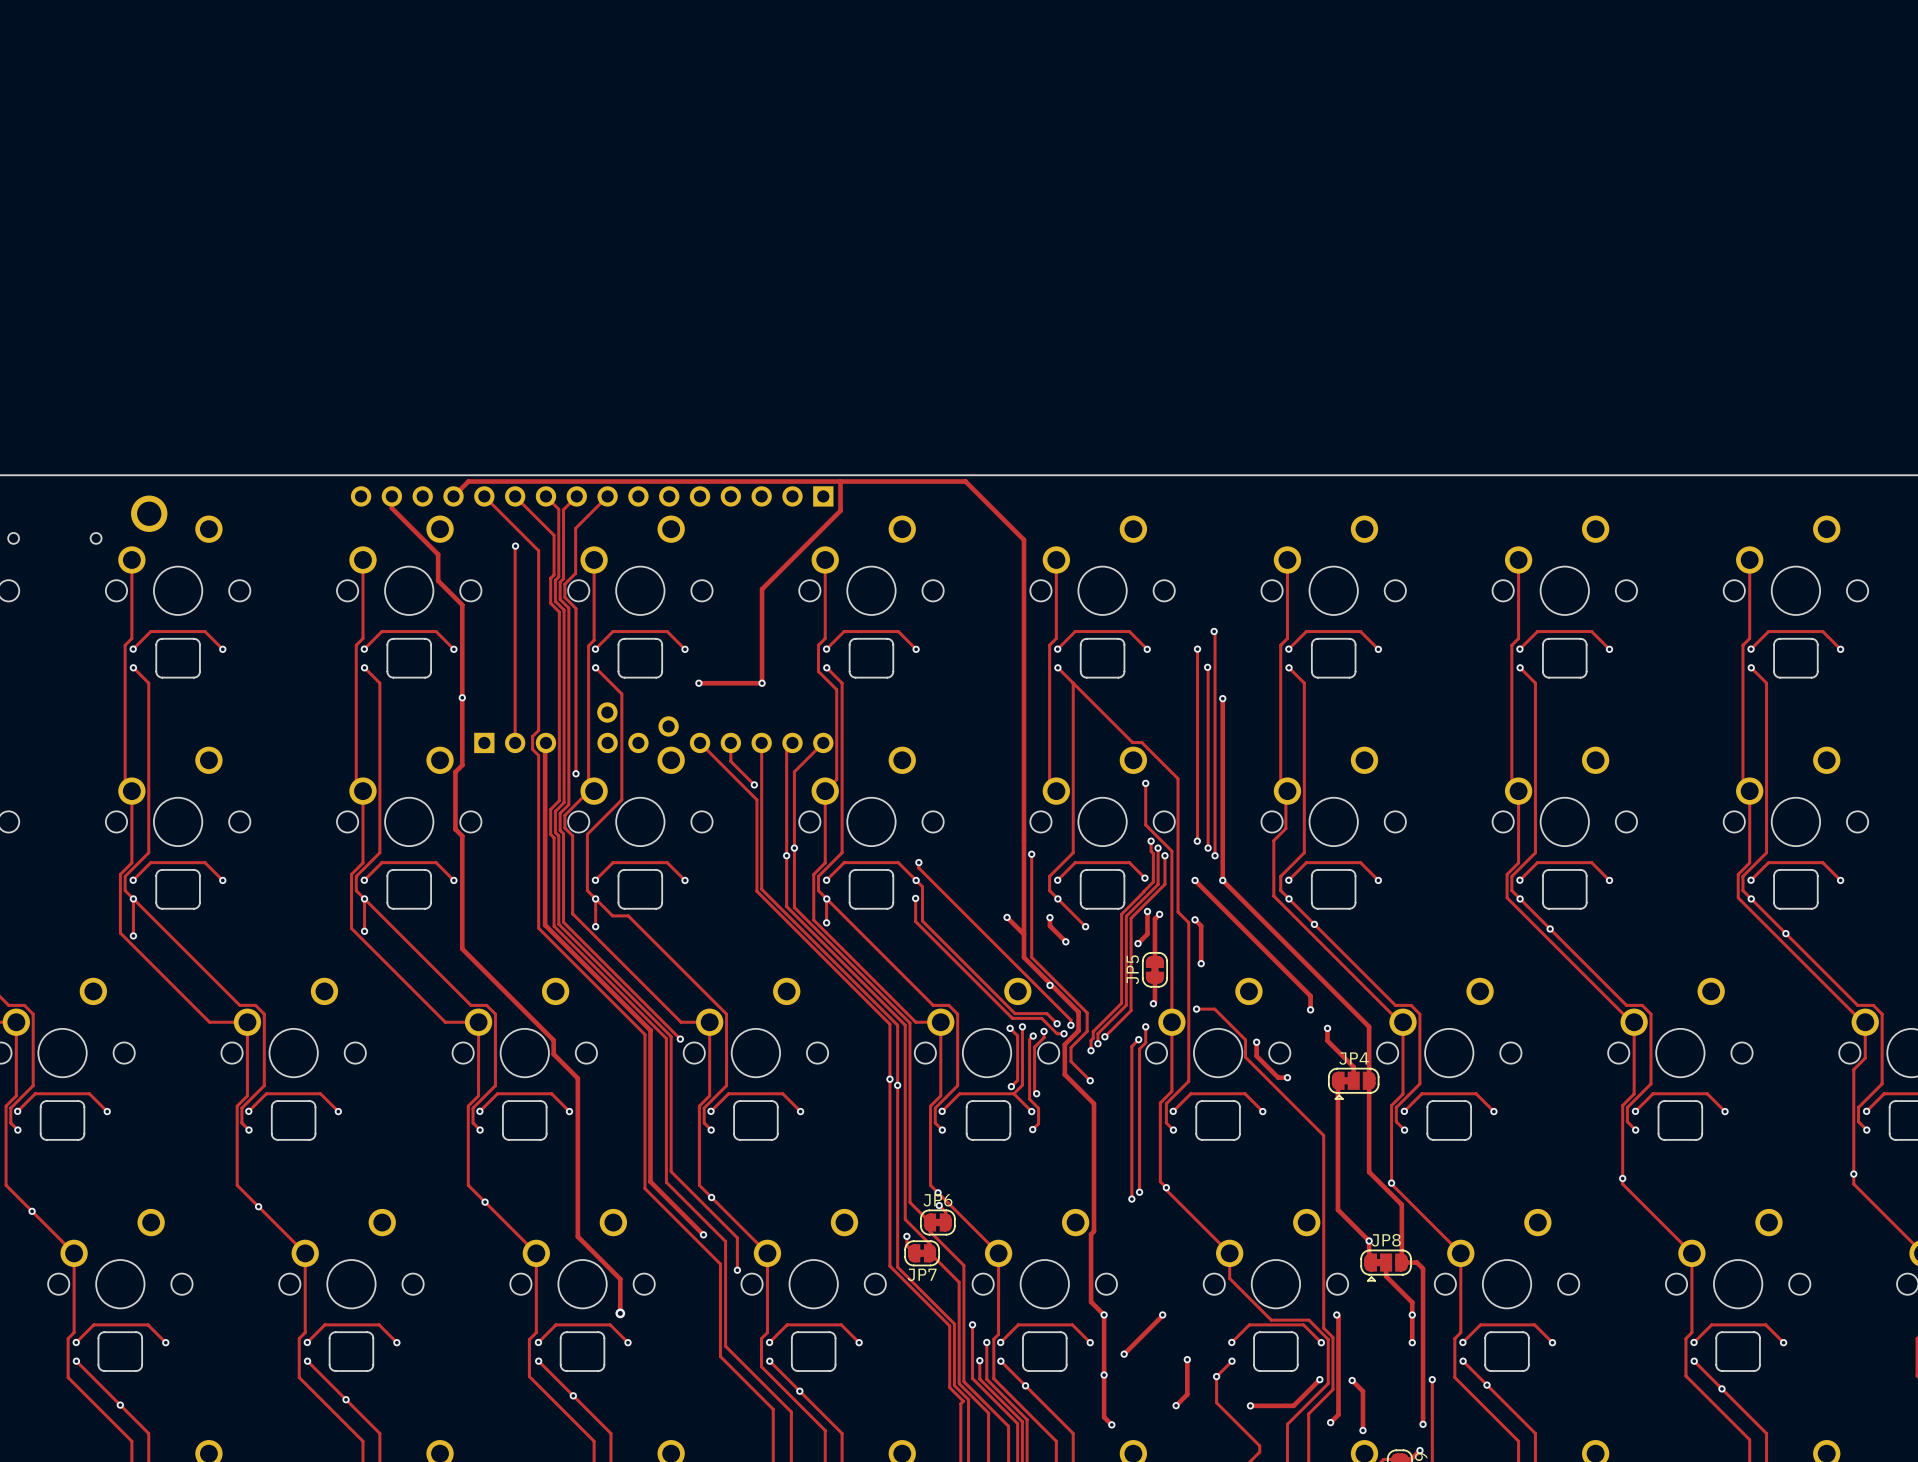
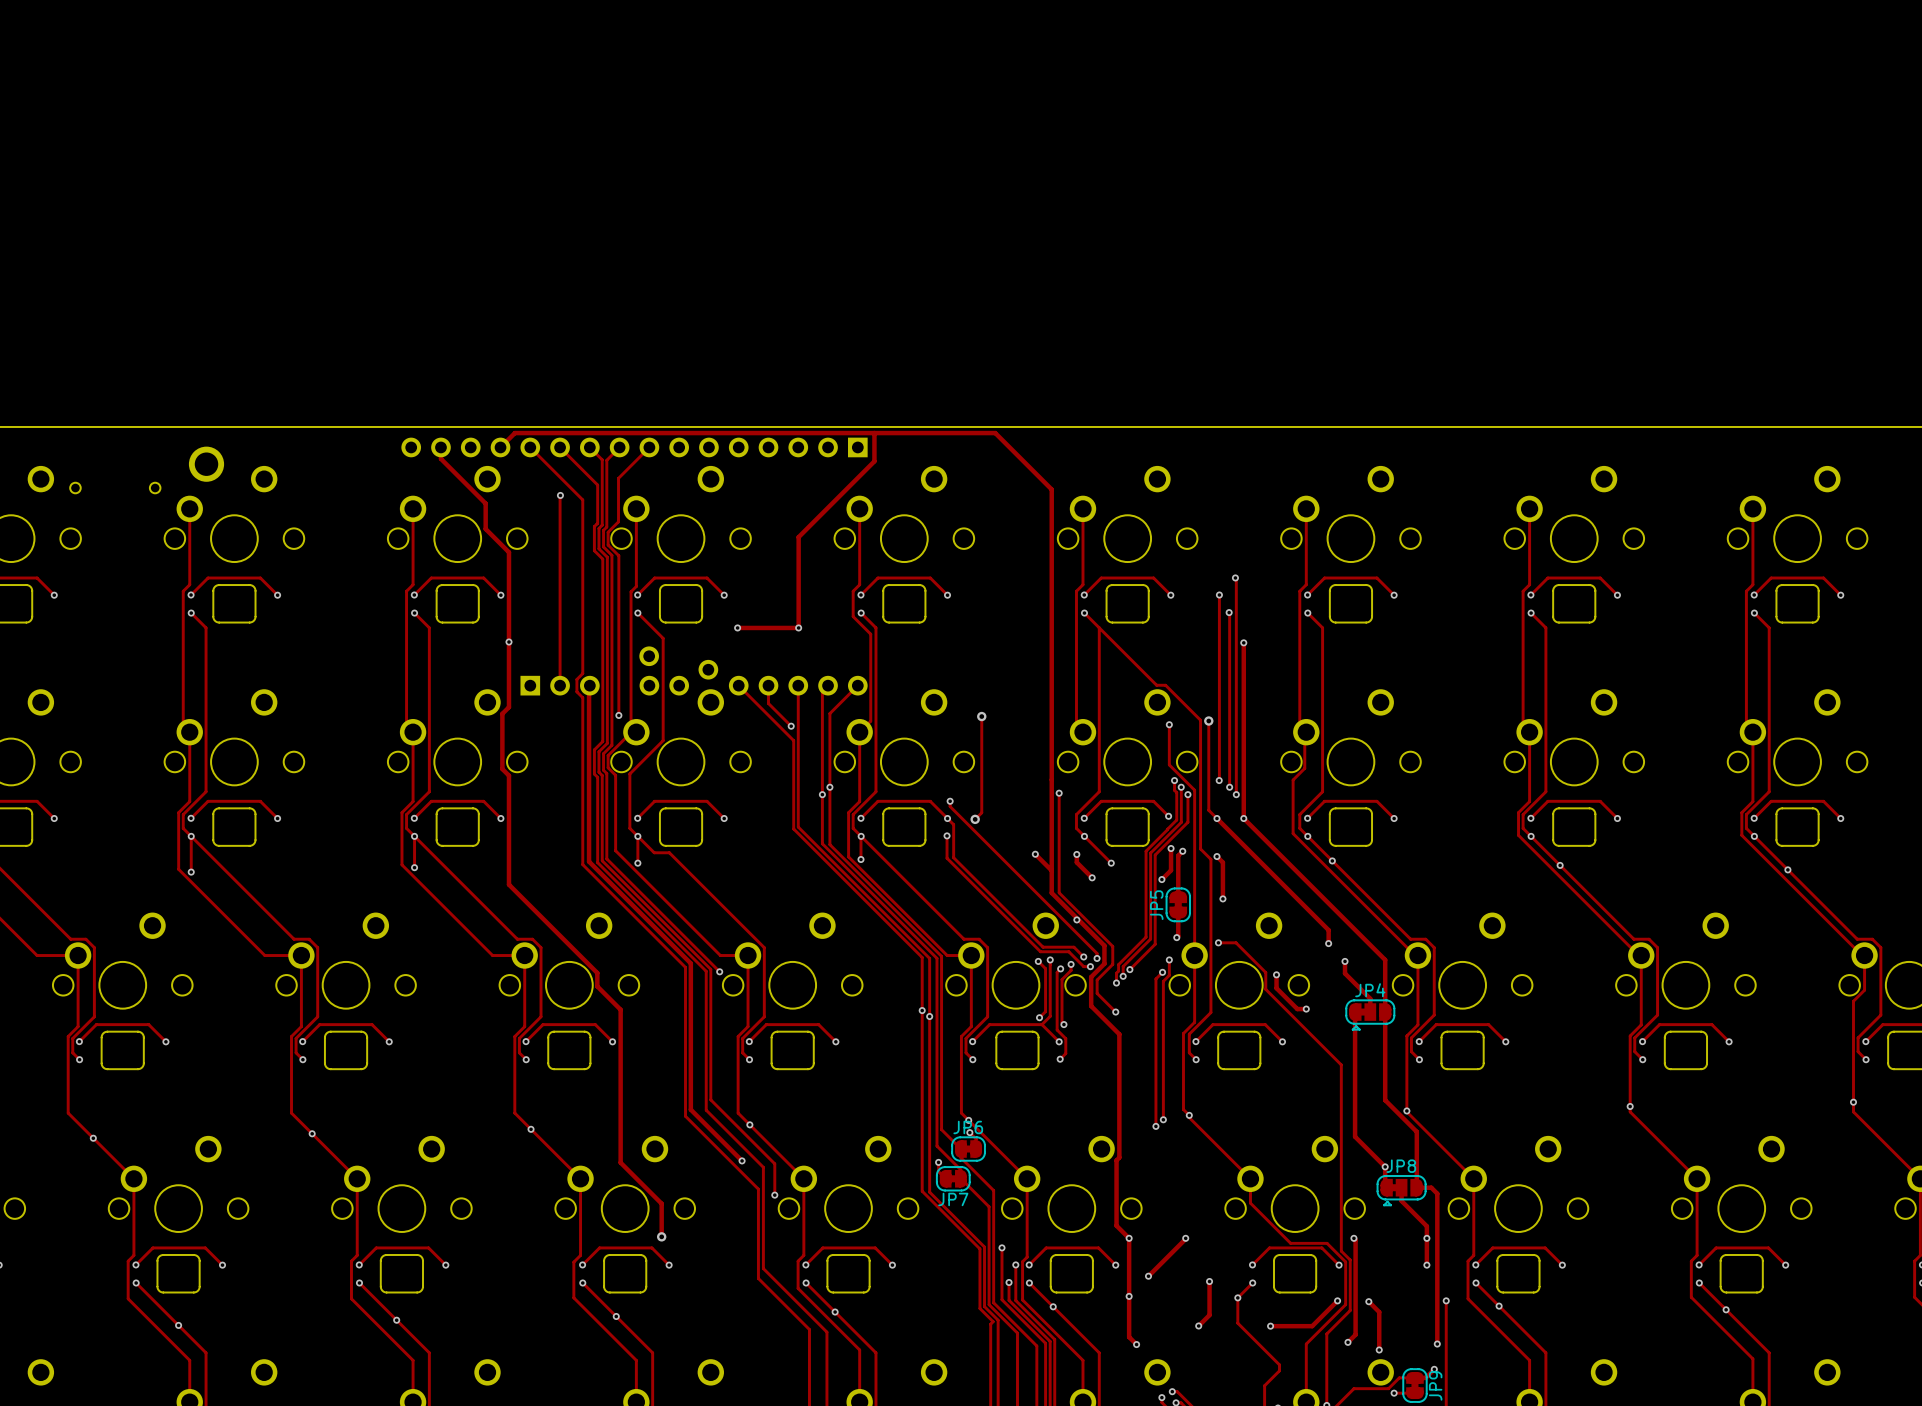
track: none -> (981, 716) (981, 812) (975, 819)
via: none -> (981, 716)
track: none -> (1208, 721) (1208, 810) (1216, 818)
via: none -> (1208, 721)
via: none -> (975, 819)

